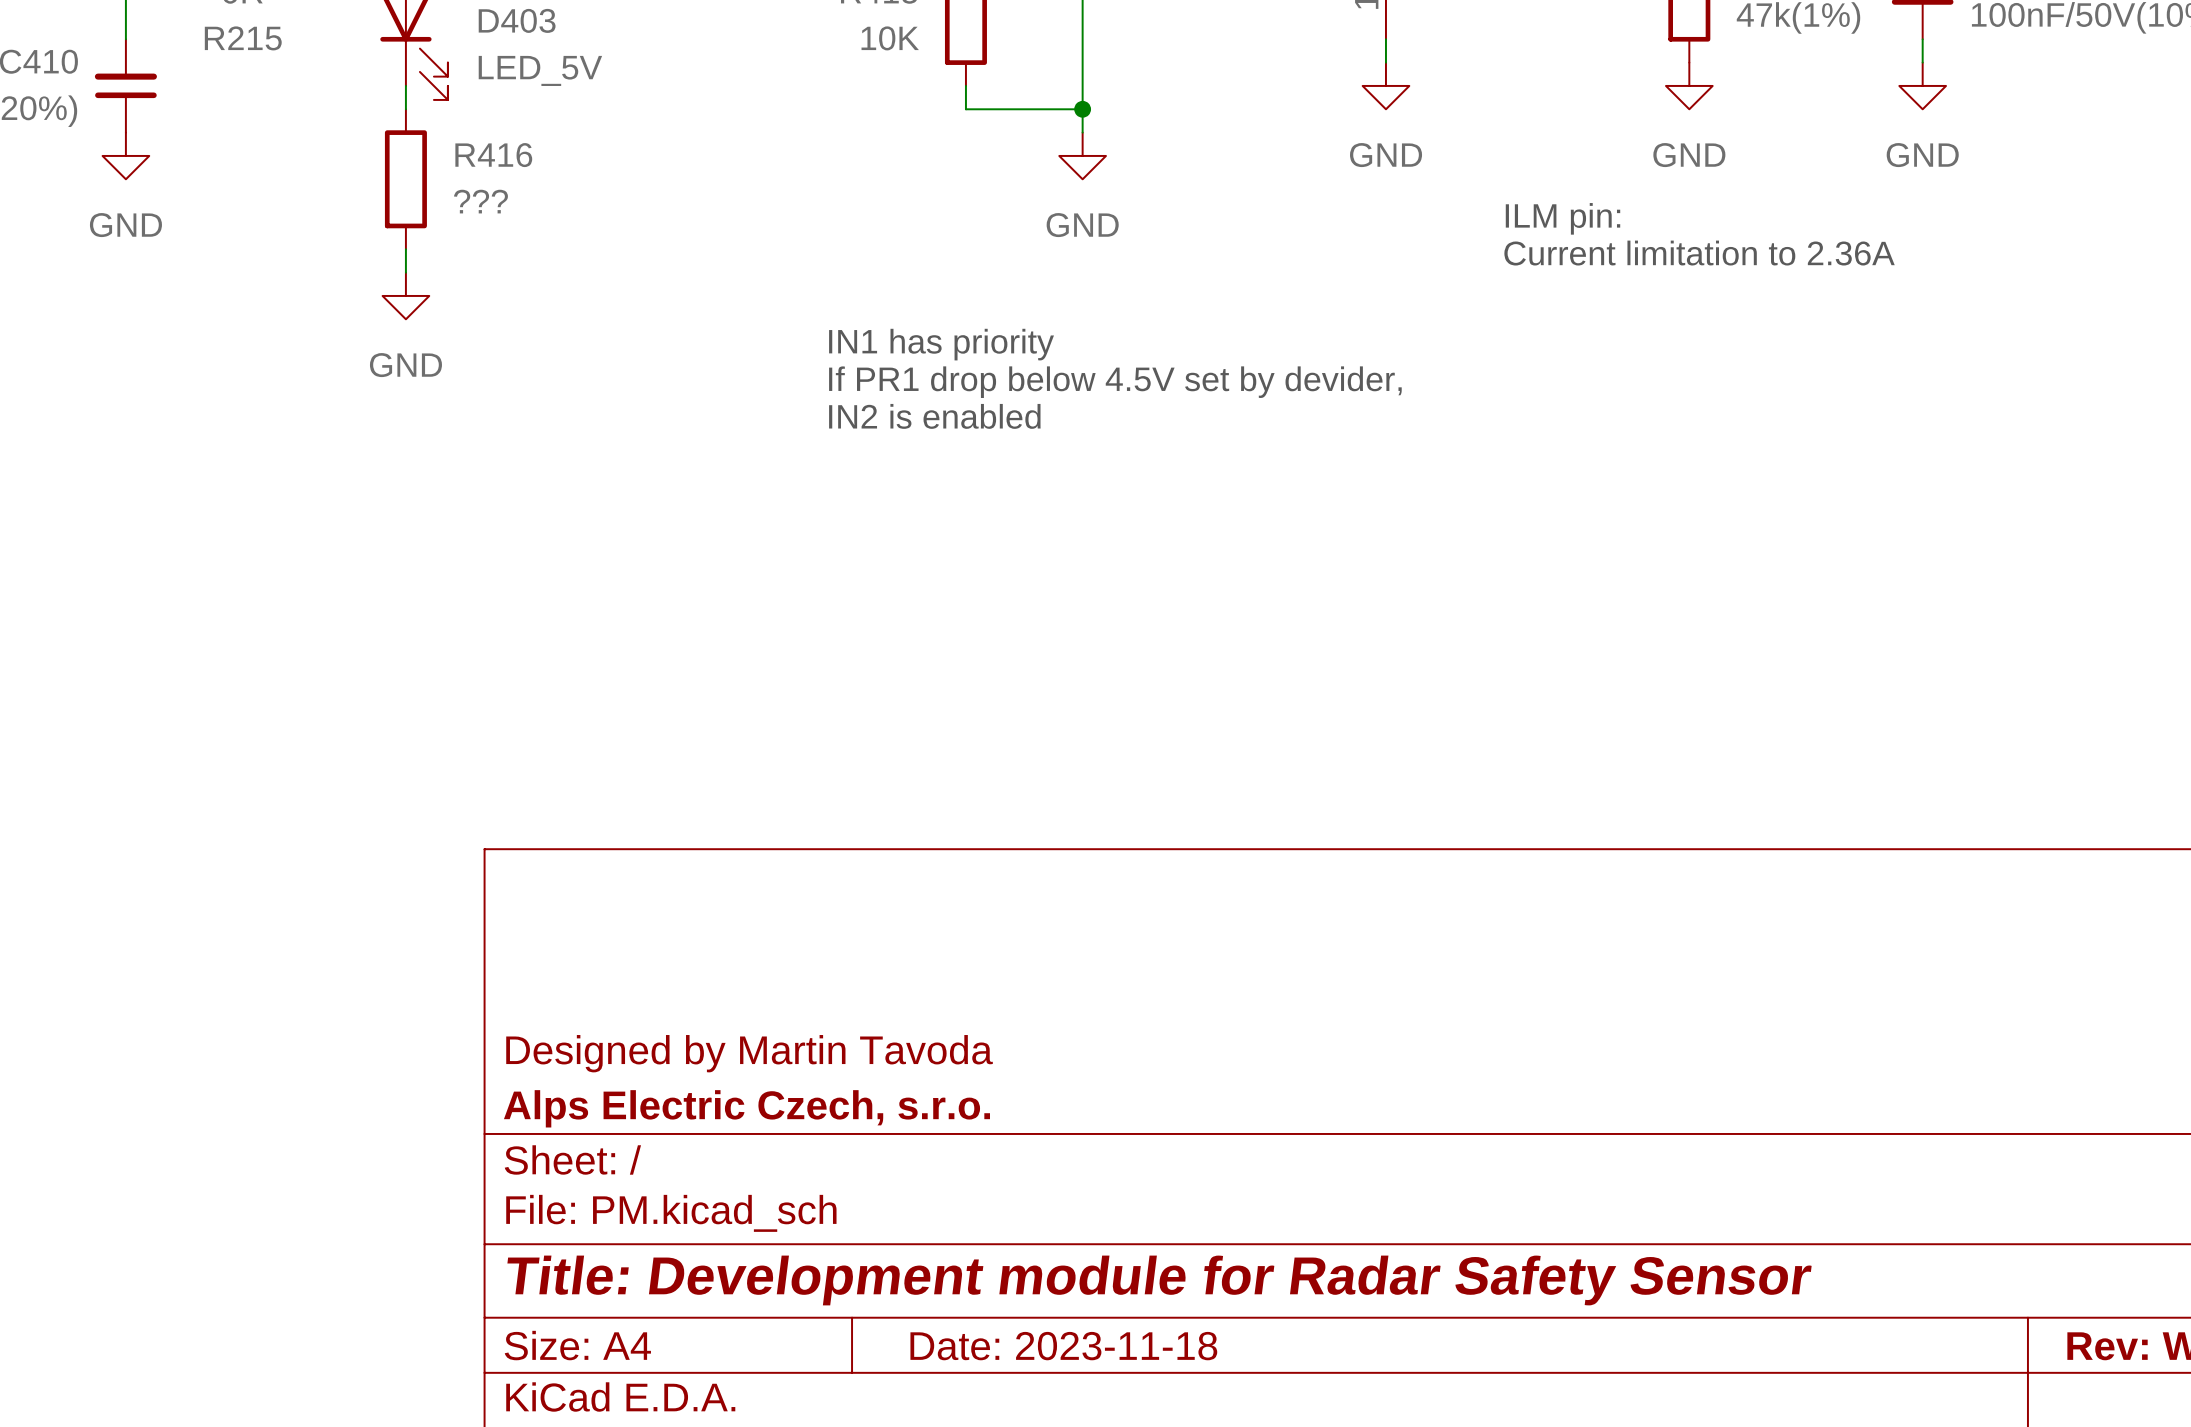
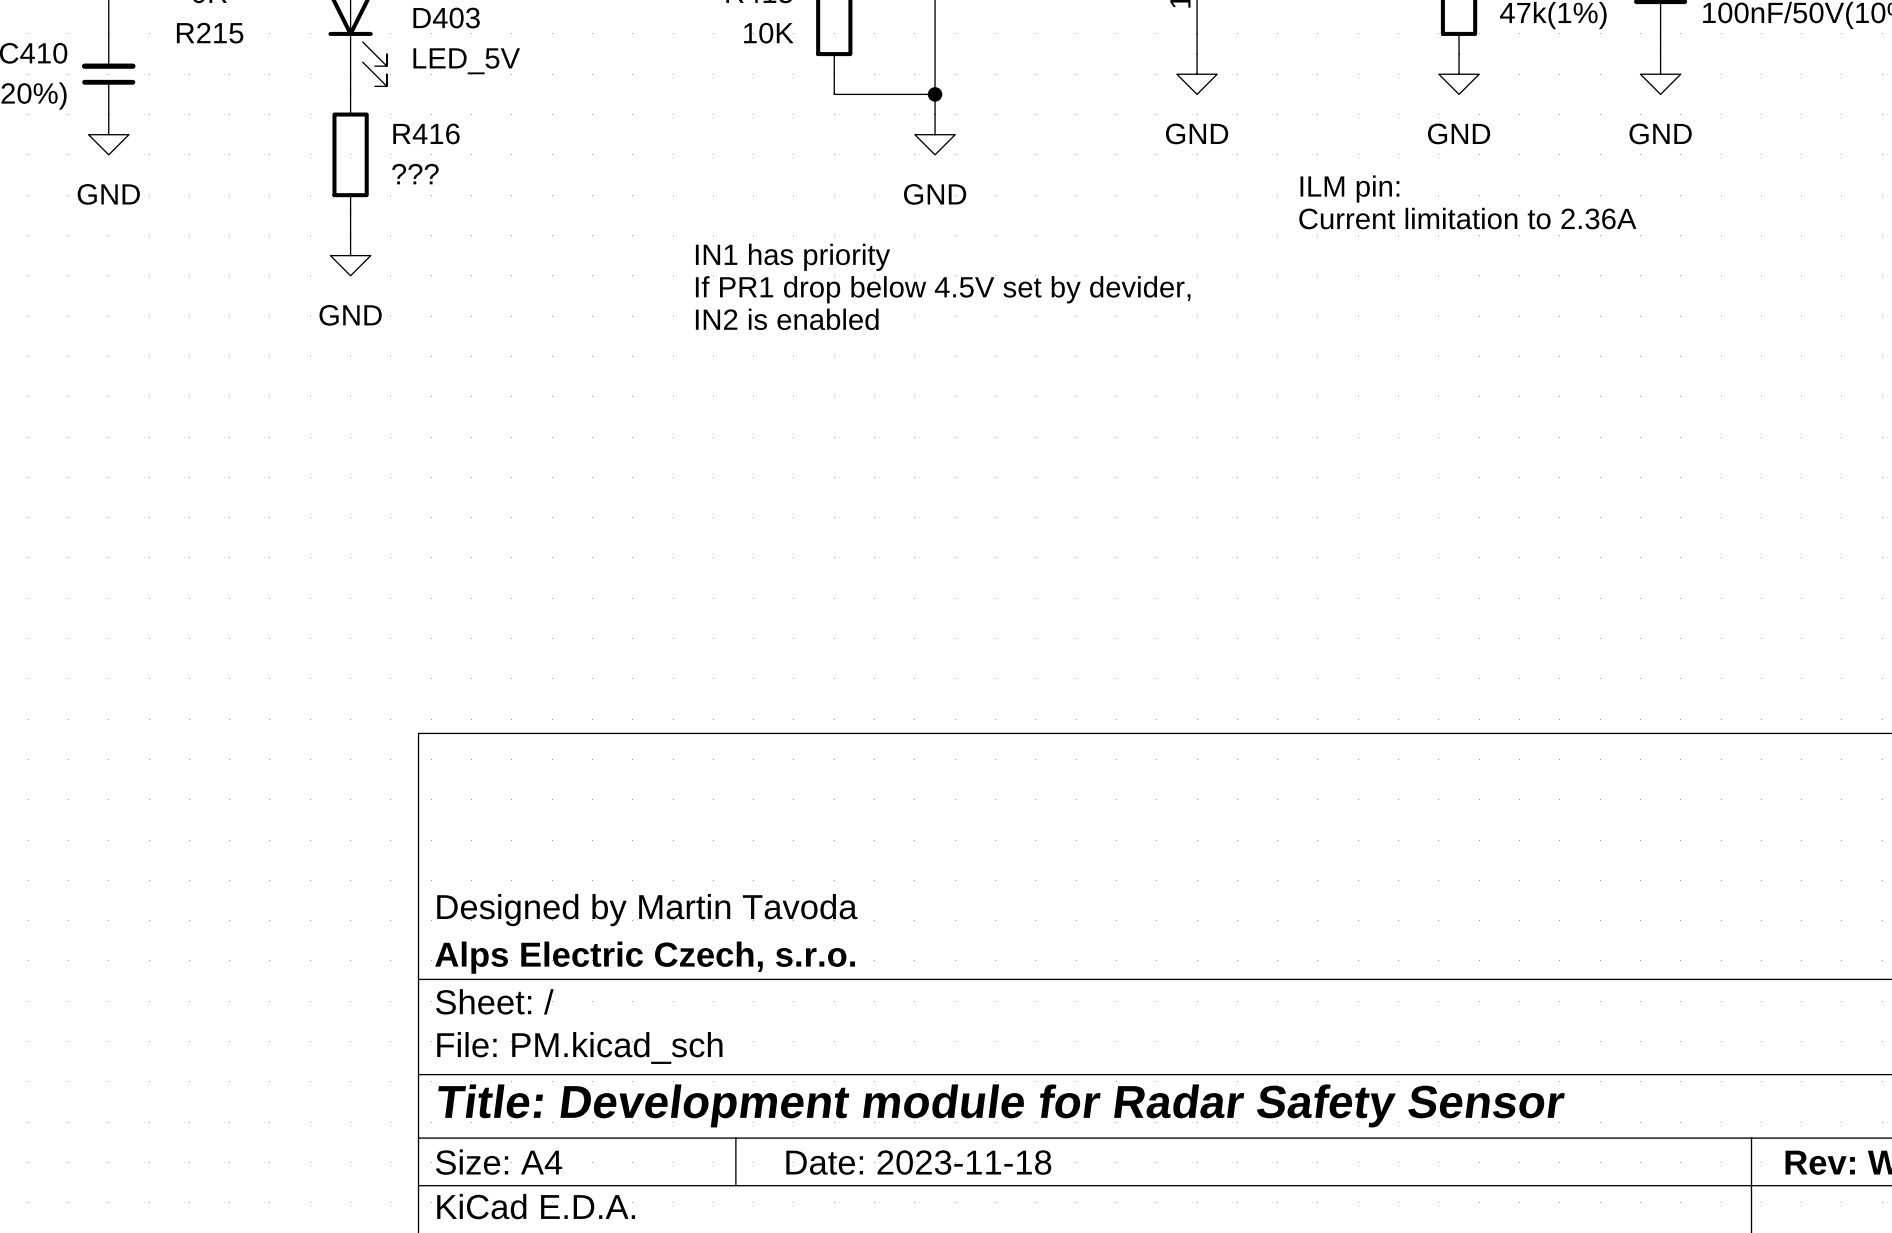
text position: IN1 has priority (941, 344) -> IN1 has priority (793, 257)
text position: If PR1 drop below 4.5V set by devider, (1115, 382) -> If PR1 drop below 4.5V set by devider, (943, 289)
text position: IN2 is enabled (934, 416) -> IN2 is enabled (787, 319)

